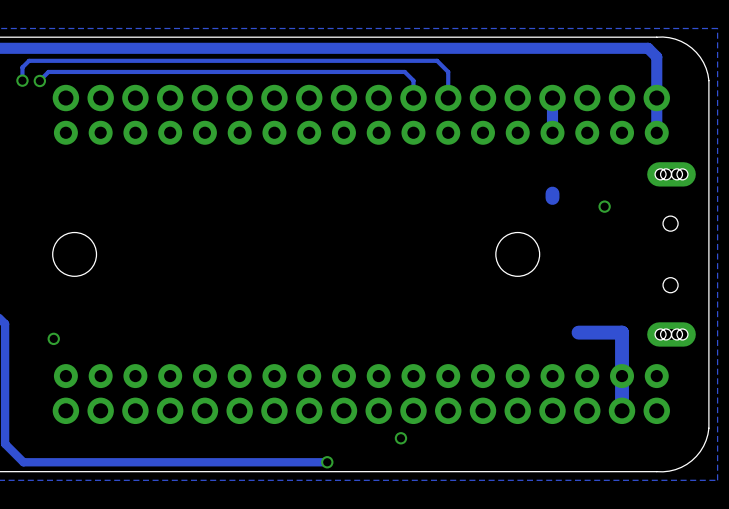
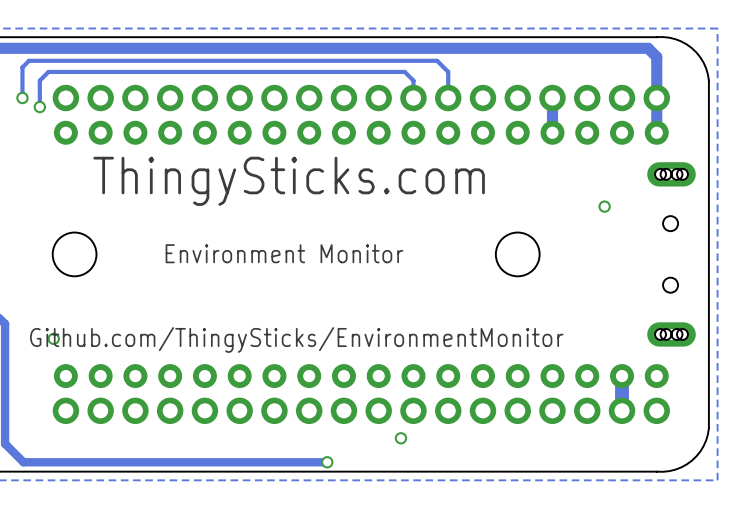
track: none -> (22, 80) (22, 98)
via: (22, 80) -> none
track: none -> (39, 80) (39, 107)
via: (39, 80) -> none
via: none -> (22, 98)
via: none -> (39, 107)
text: none -> ThingySticks.com (289, 181)
track: (552, 193) (552, 197) -> none
text: none -> Environment Monitor (284, 253)
track: (578, 332) (622, 332) (622, 376) -> none
text: none -> Github.com/ThingySticks/EnvironmentMonitor (296, 339)

